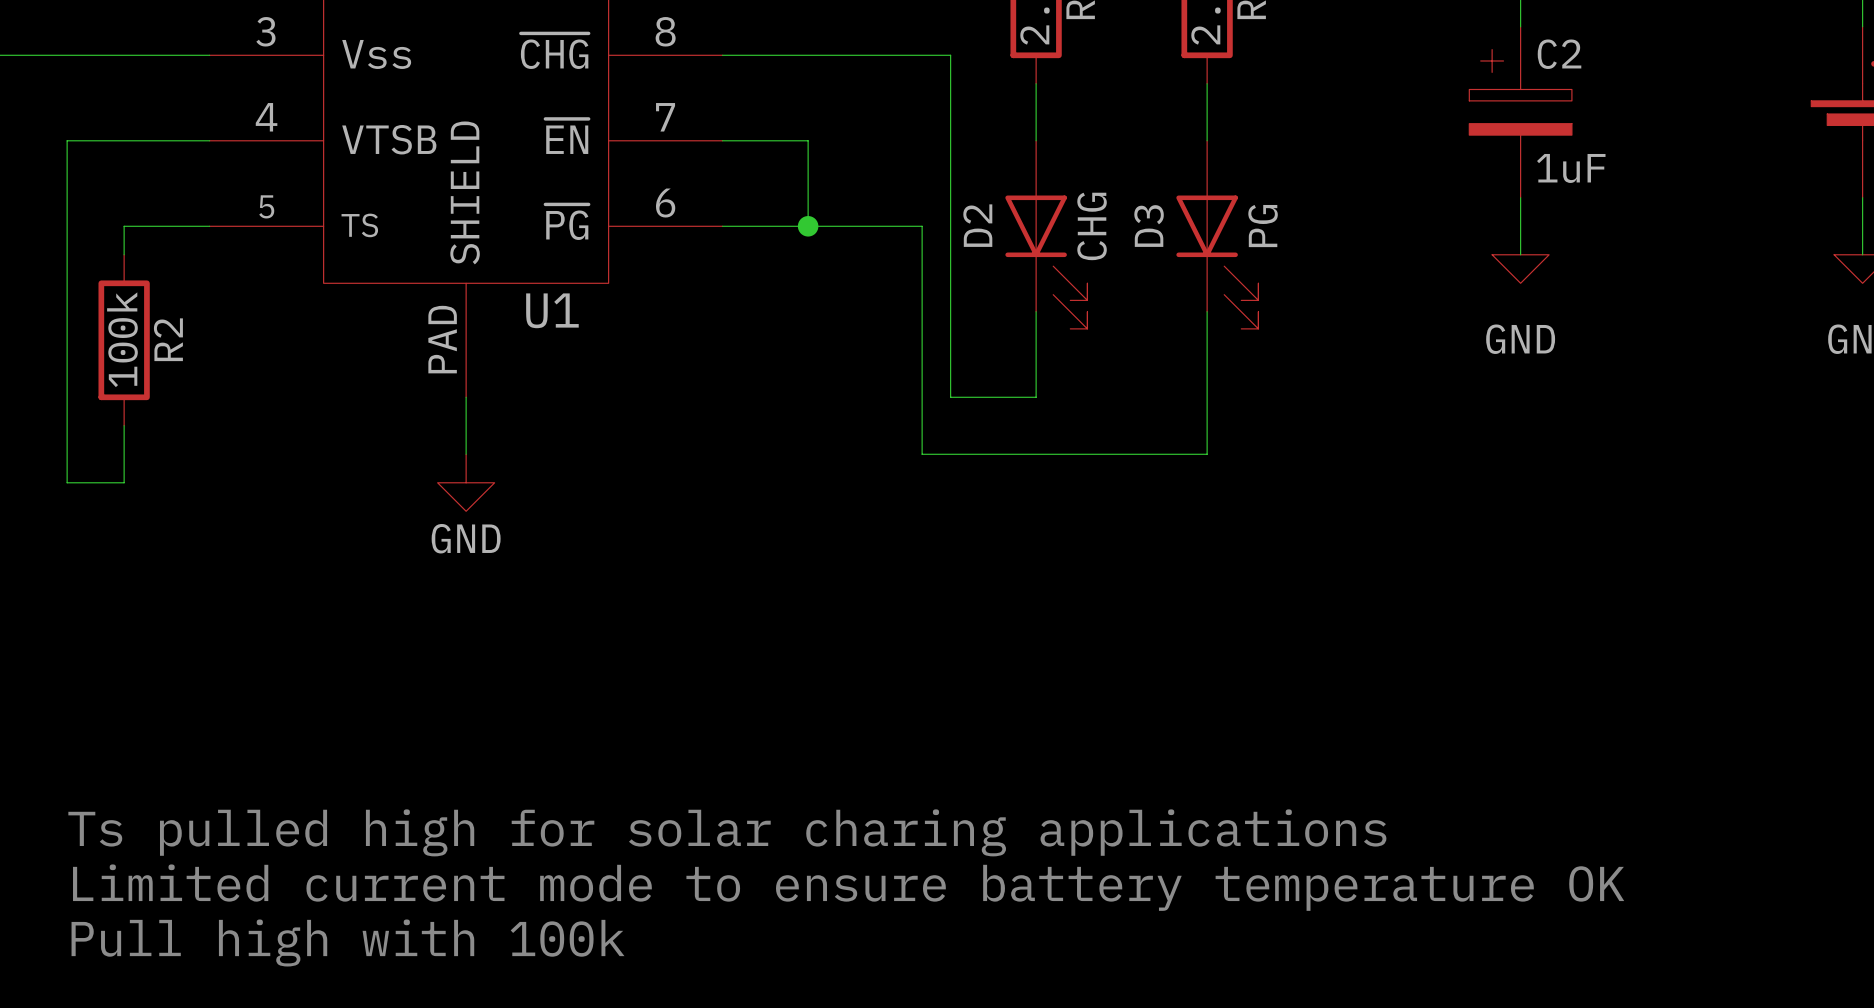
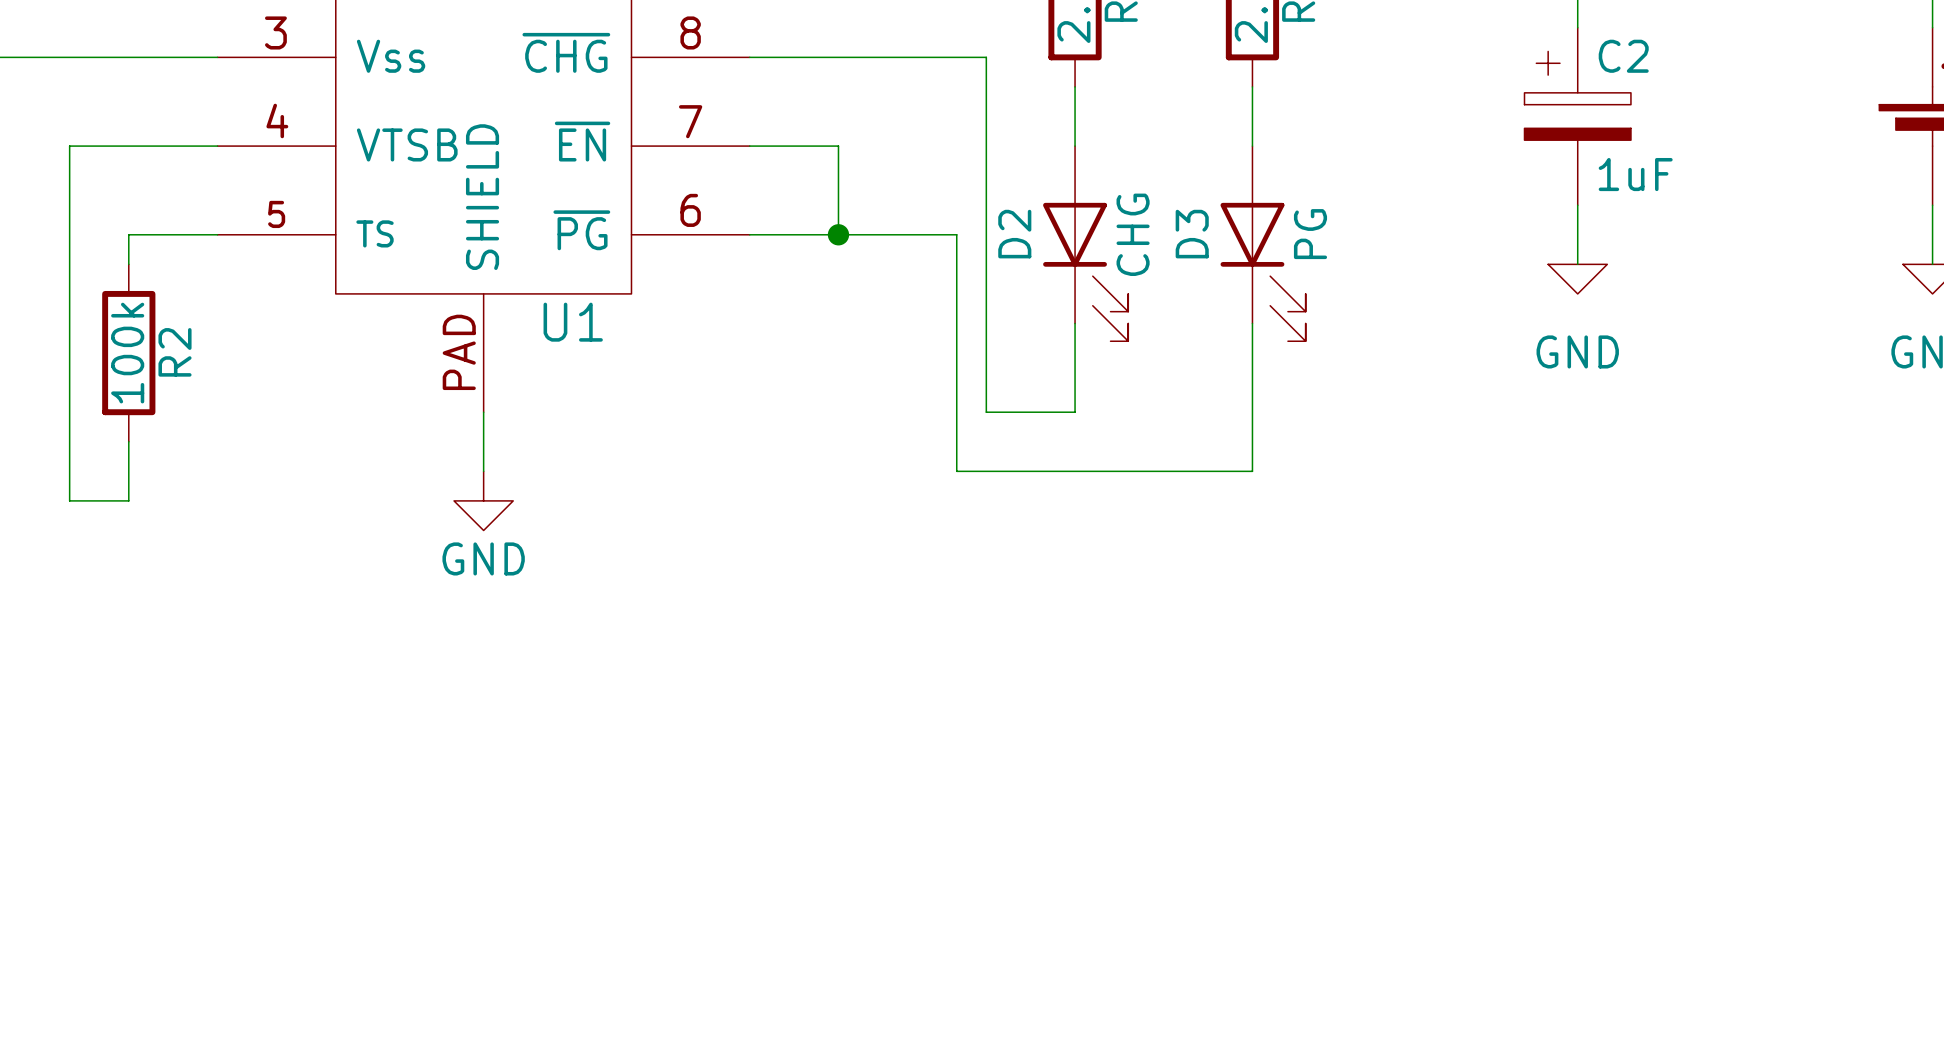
text: Ts pulled high for solar charing applications (727, 832) -> none
text: Limited current mode to ensure battery temperature OK (848, 887) -> none
text: Pull high with 100k (347, 942) -> none

